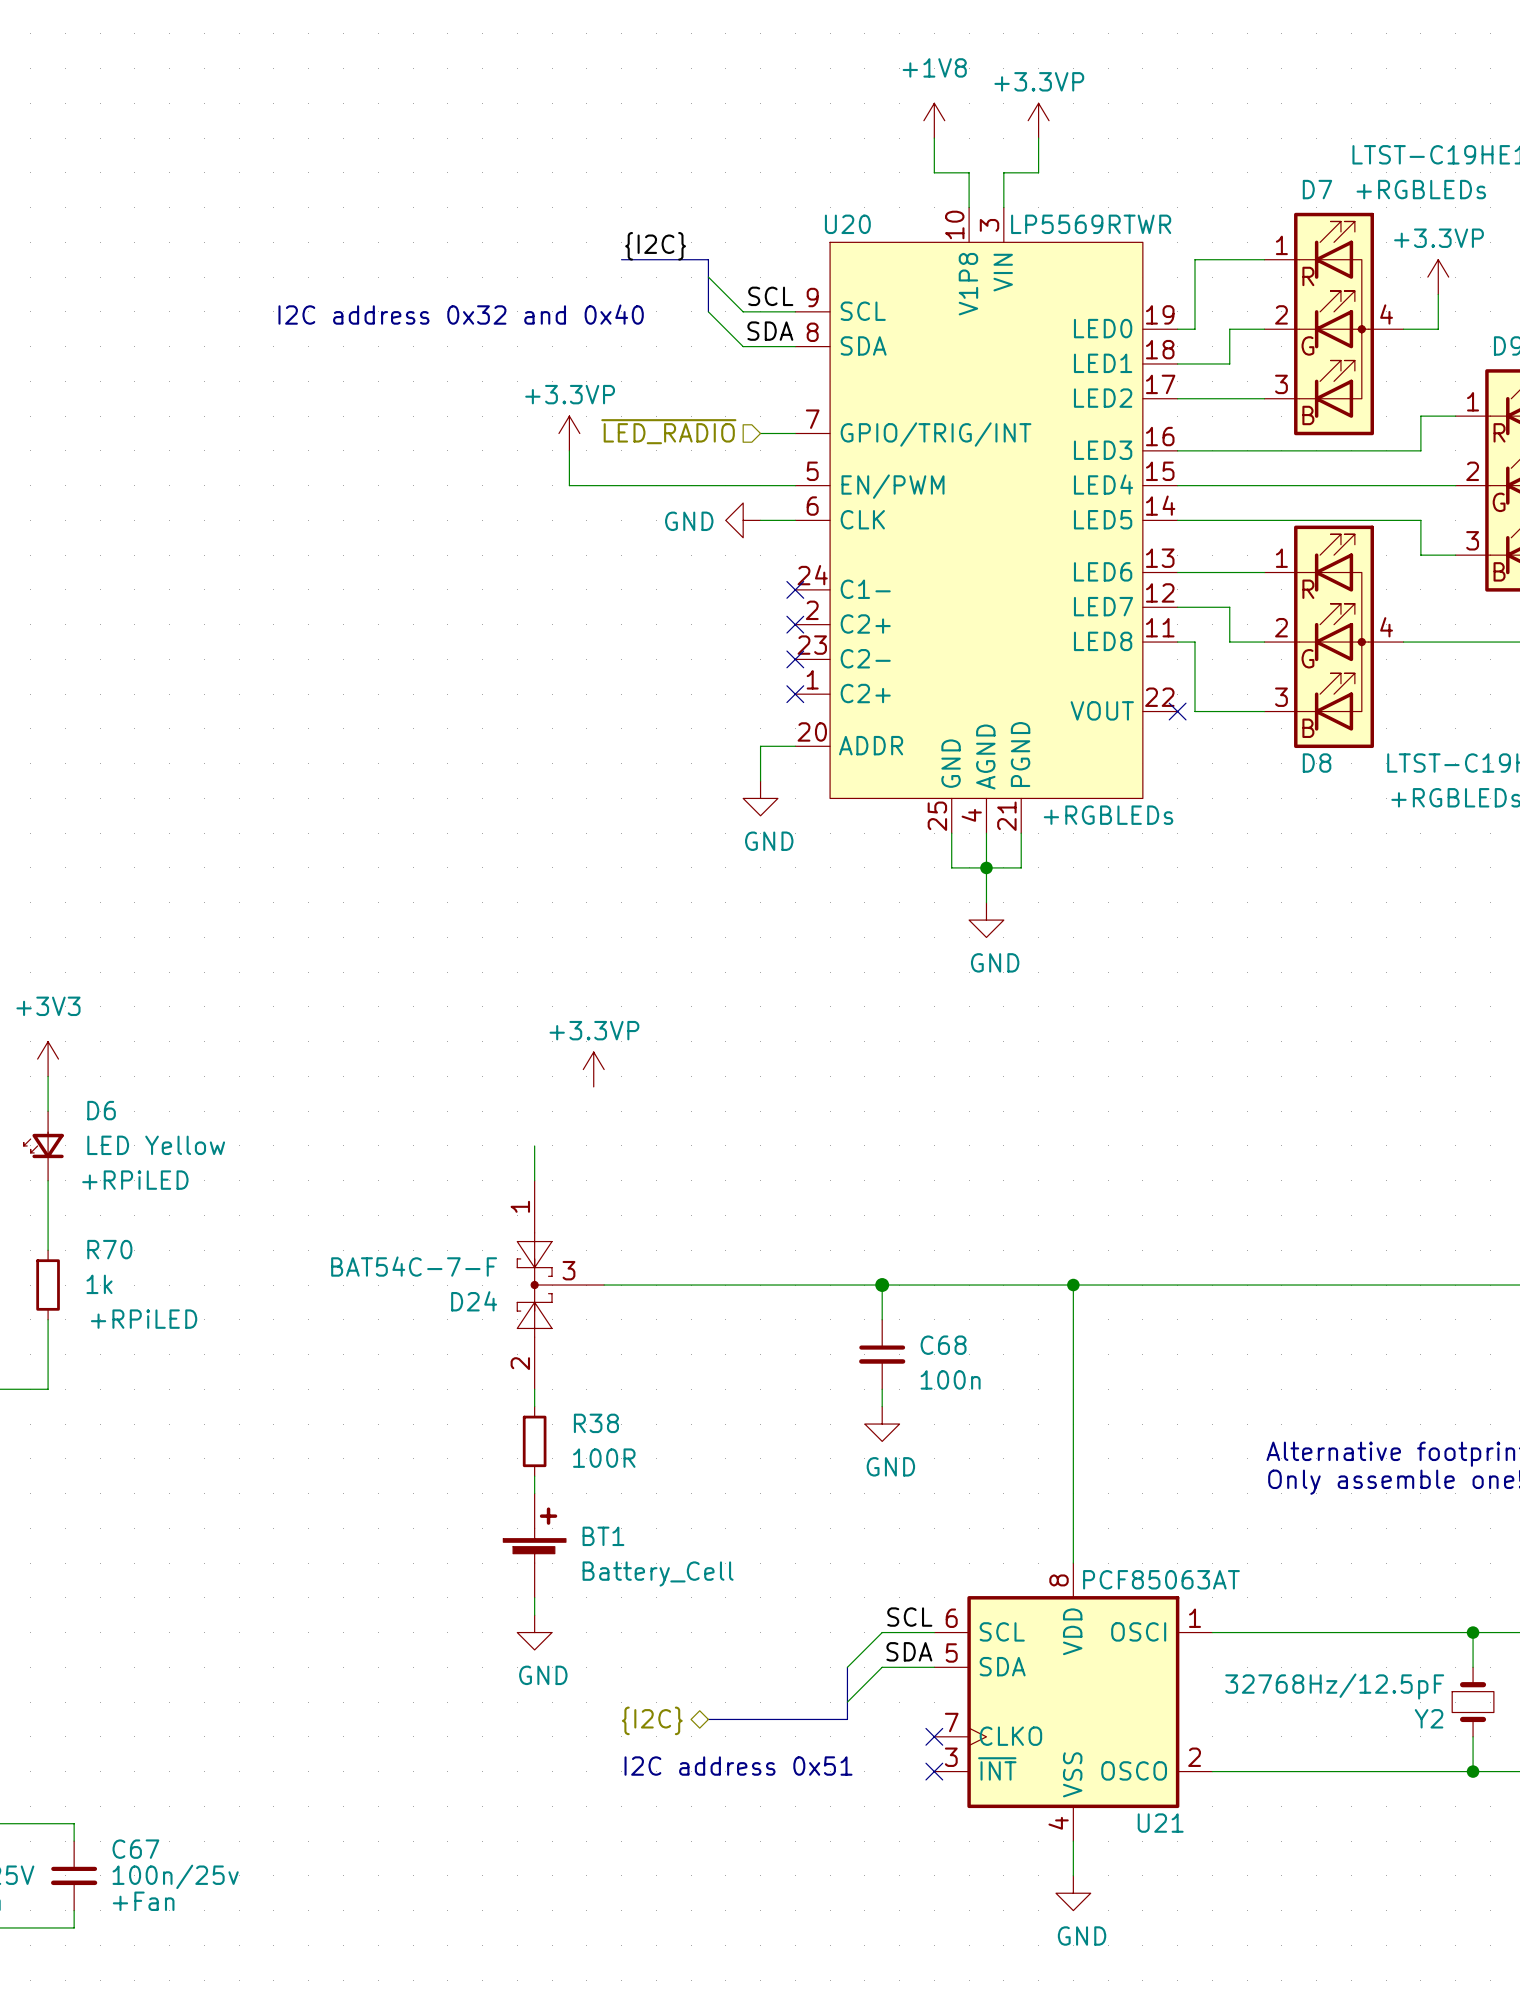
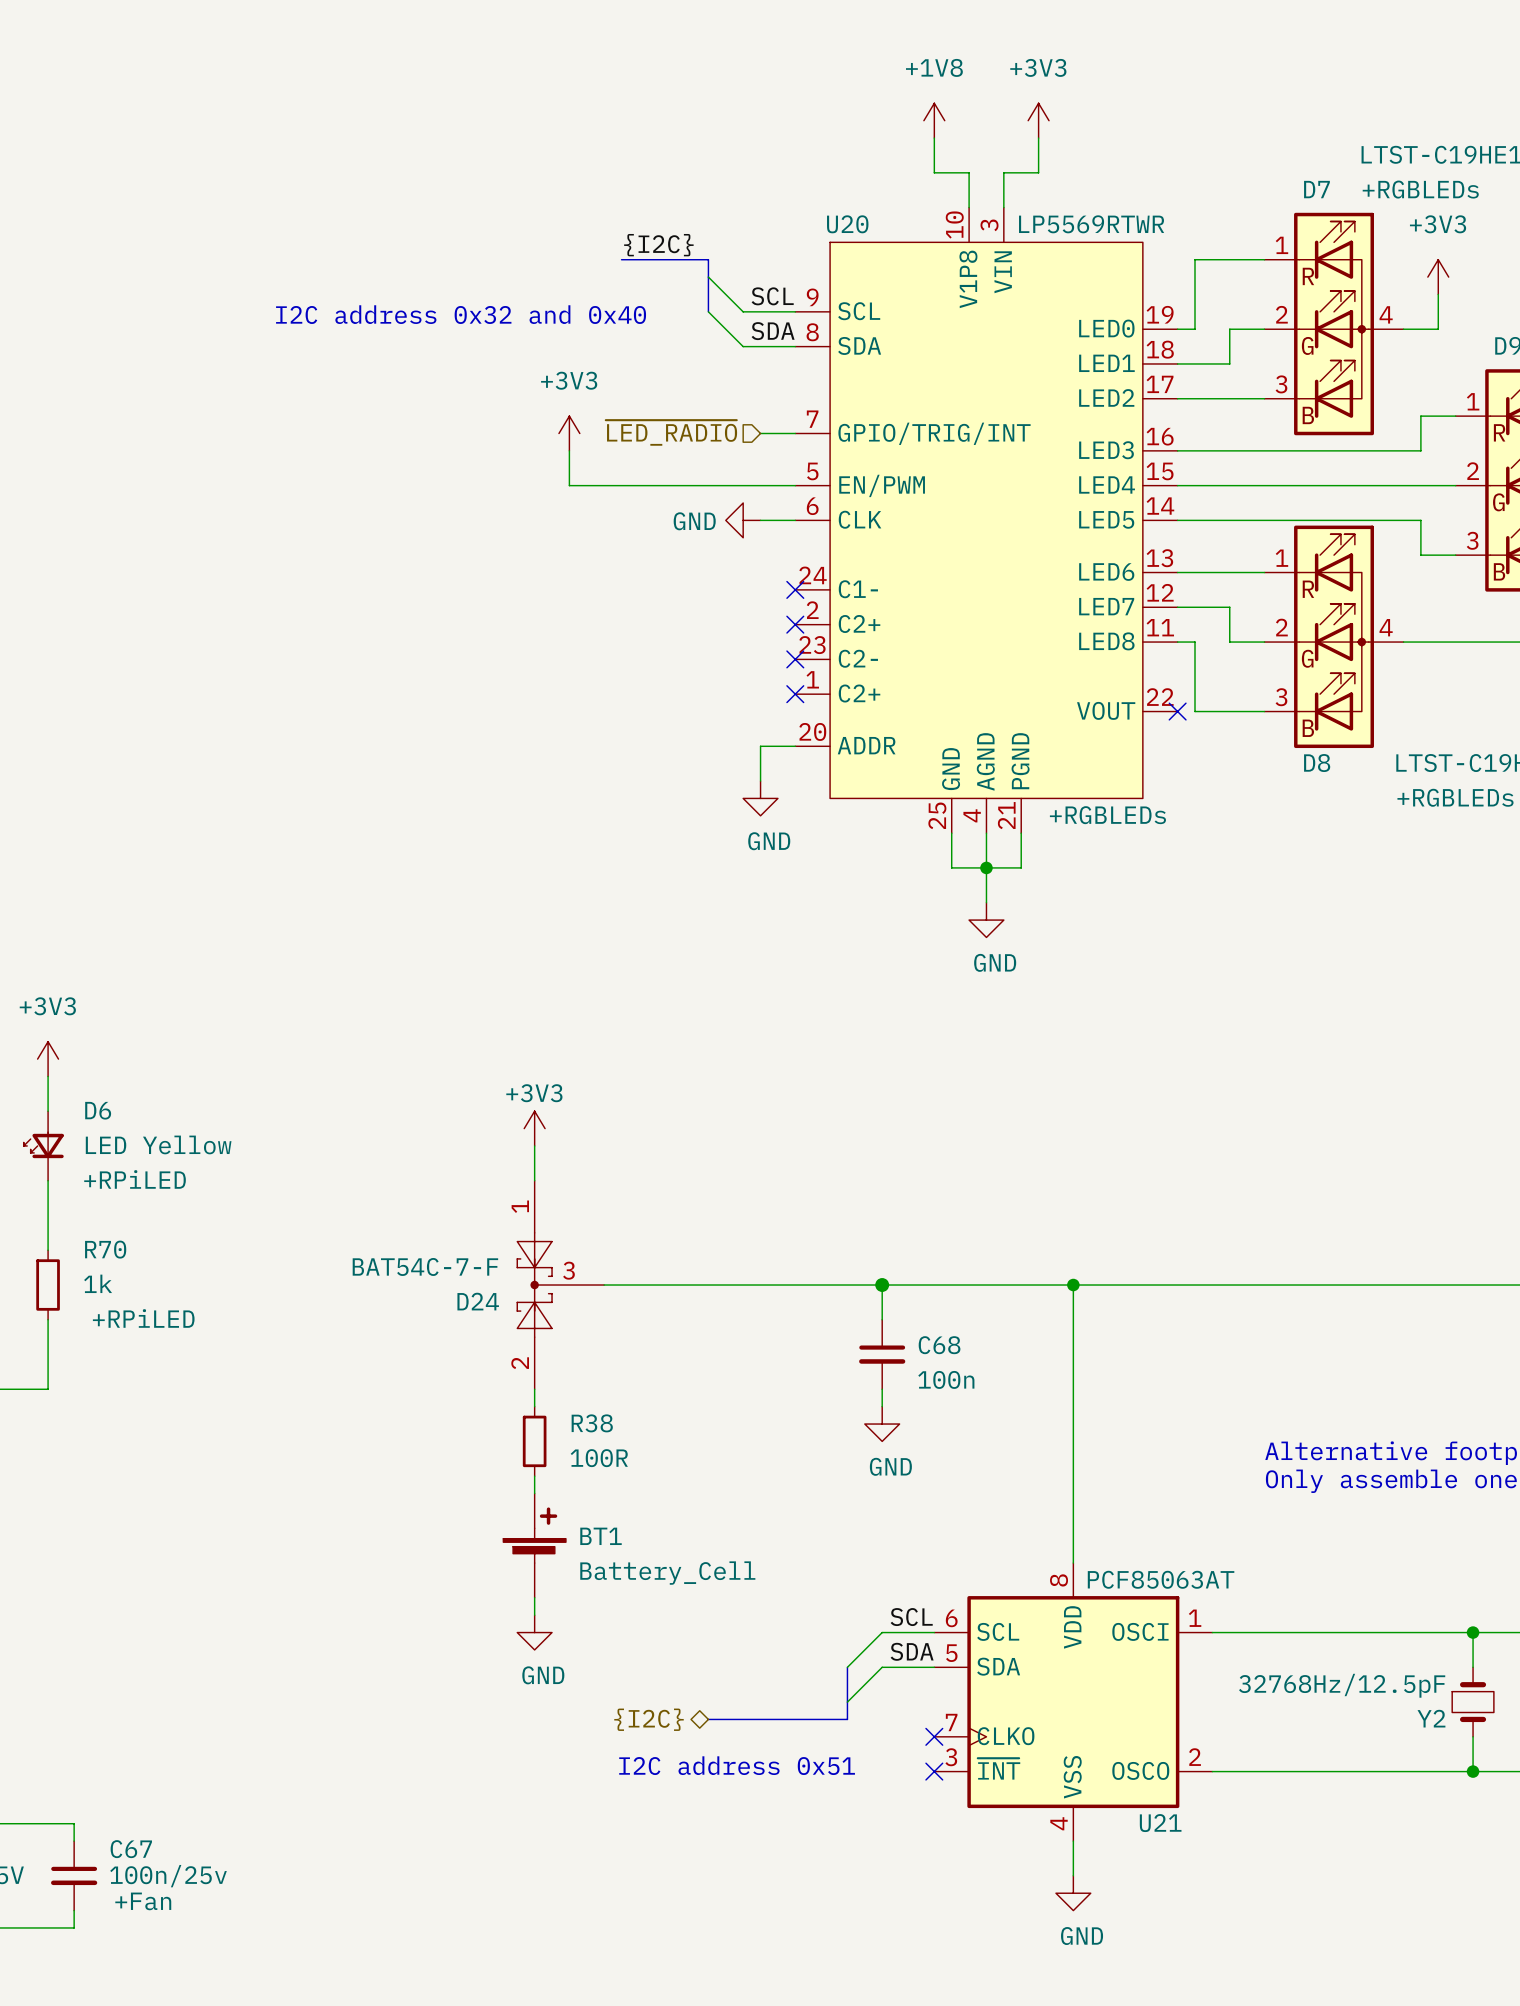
power symbol: +3.3VP (1038, 120) -> +3V3 (1038, 120)
power symbol: +3.3VP (1438, 277) -> +3V3 (1438, 277)
power symbol: +3.3VP (569, 433) -> +3V3 (569, 433)
power symbol: +3.3VP (593, 1069) -> none
power symbol: none -> +3V3 (534, 1128)

